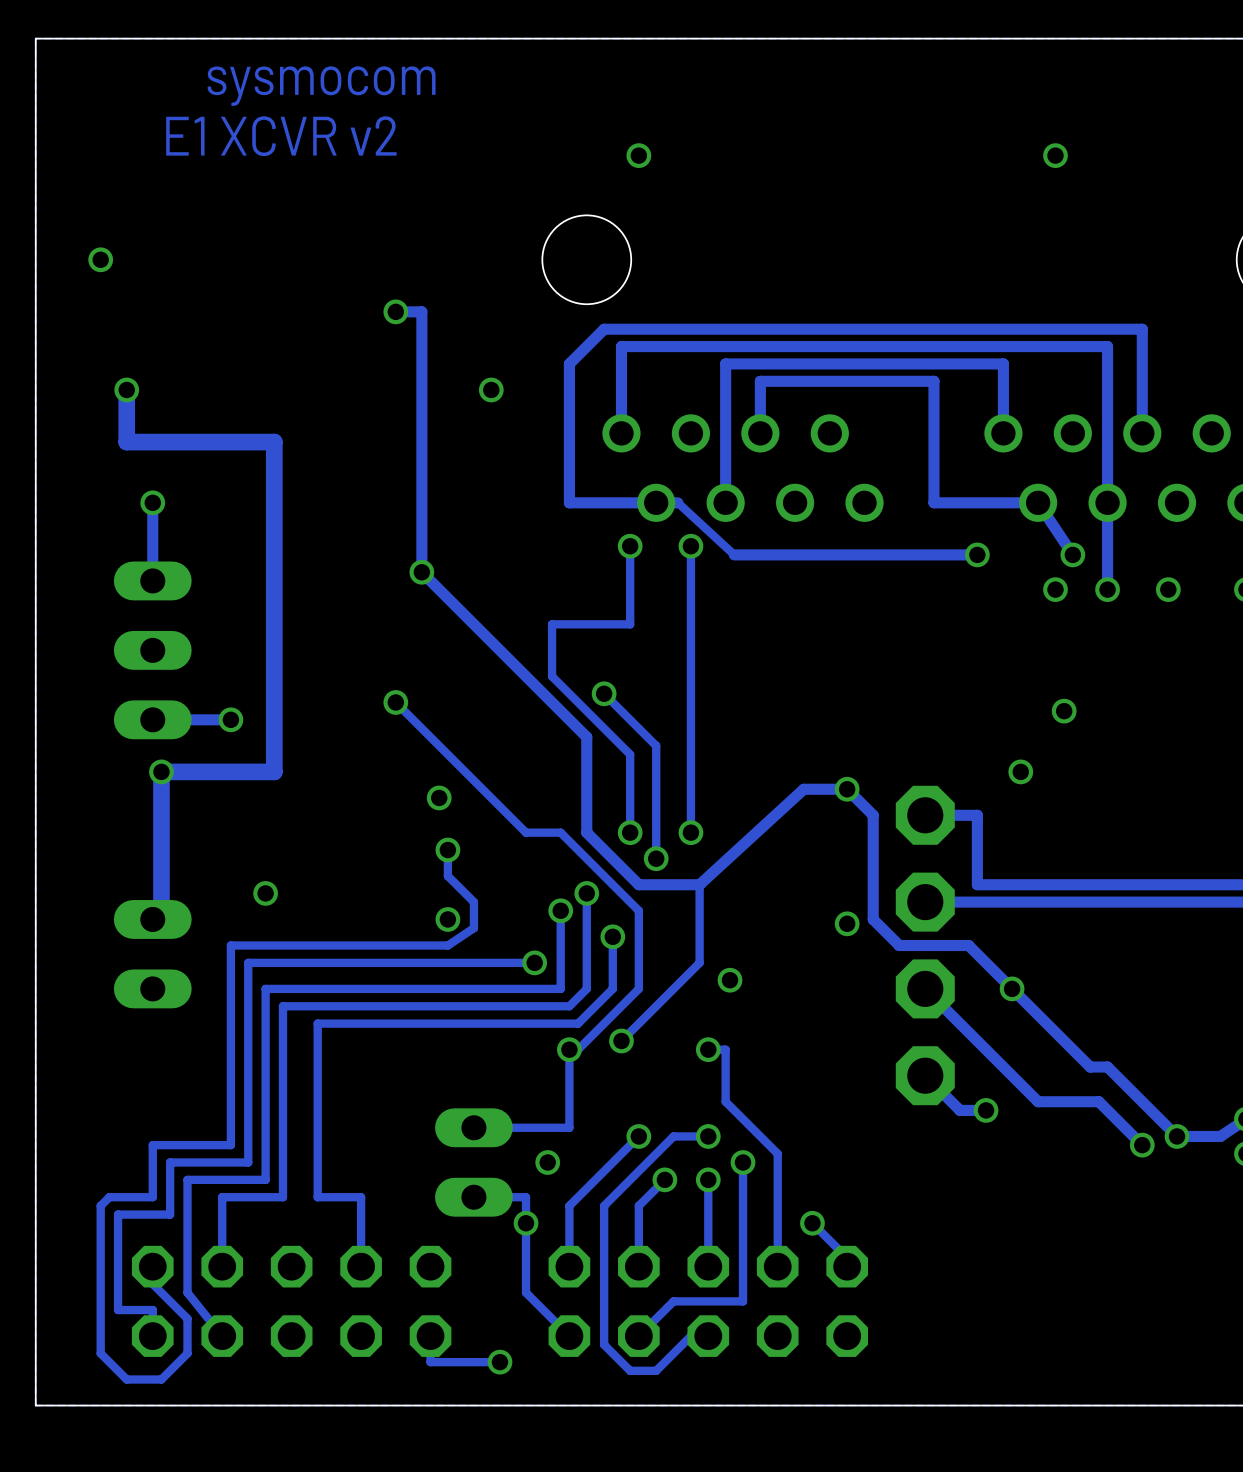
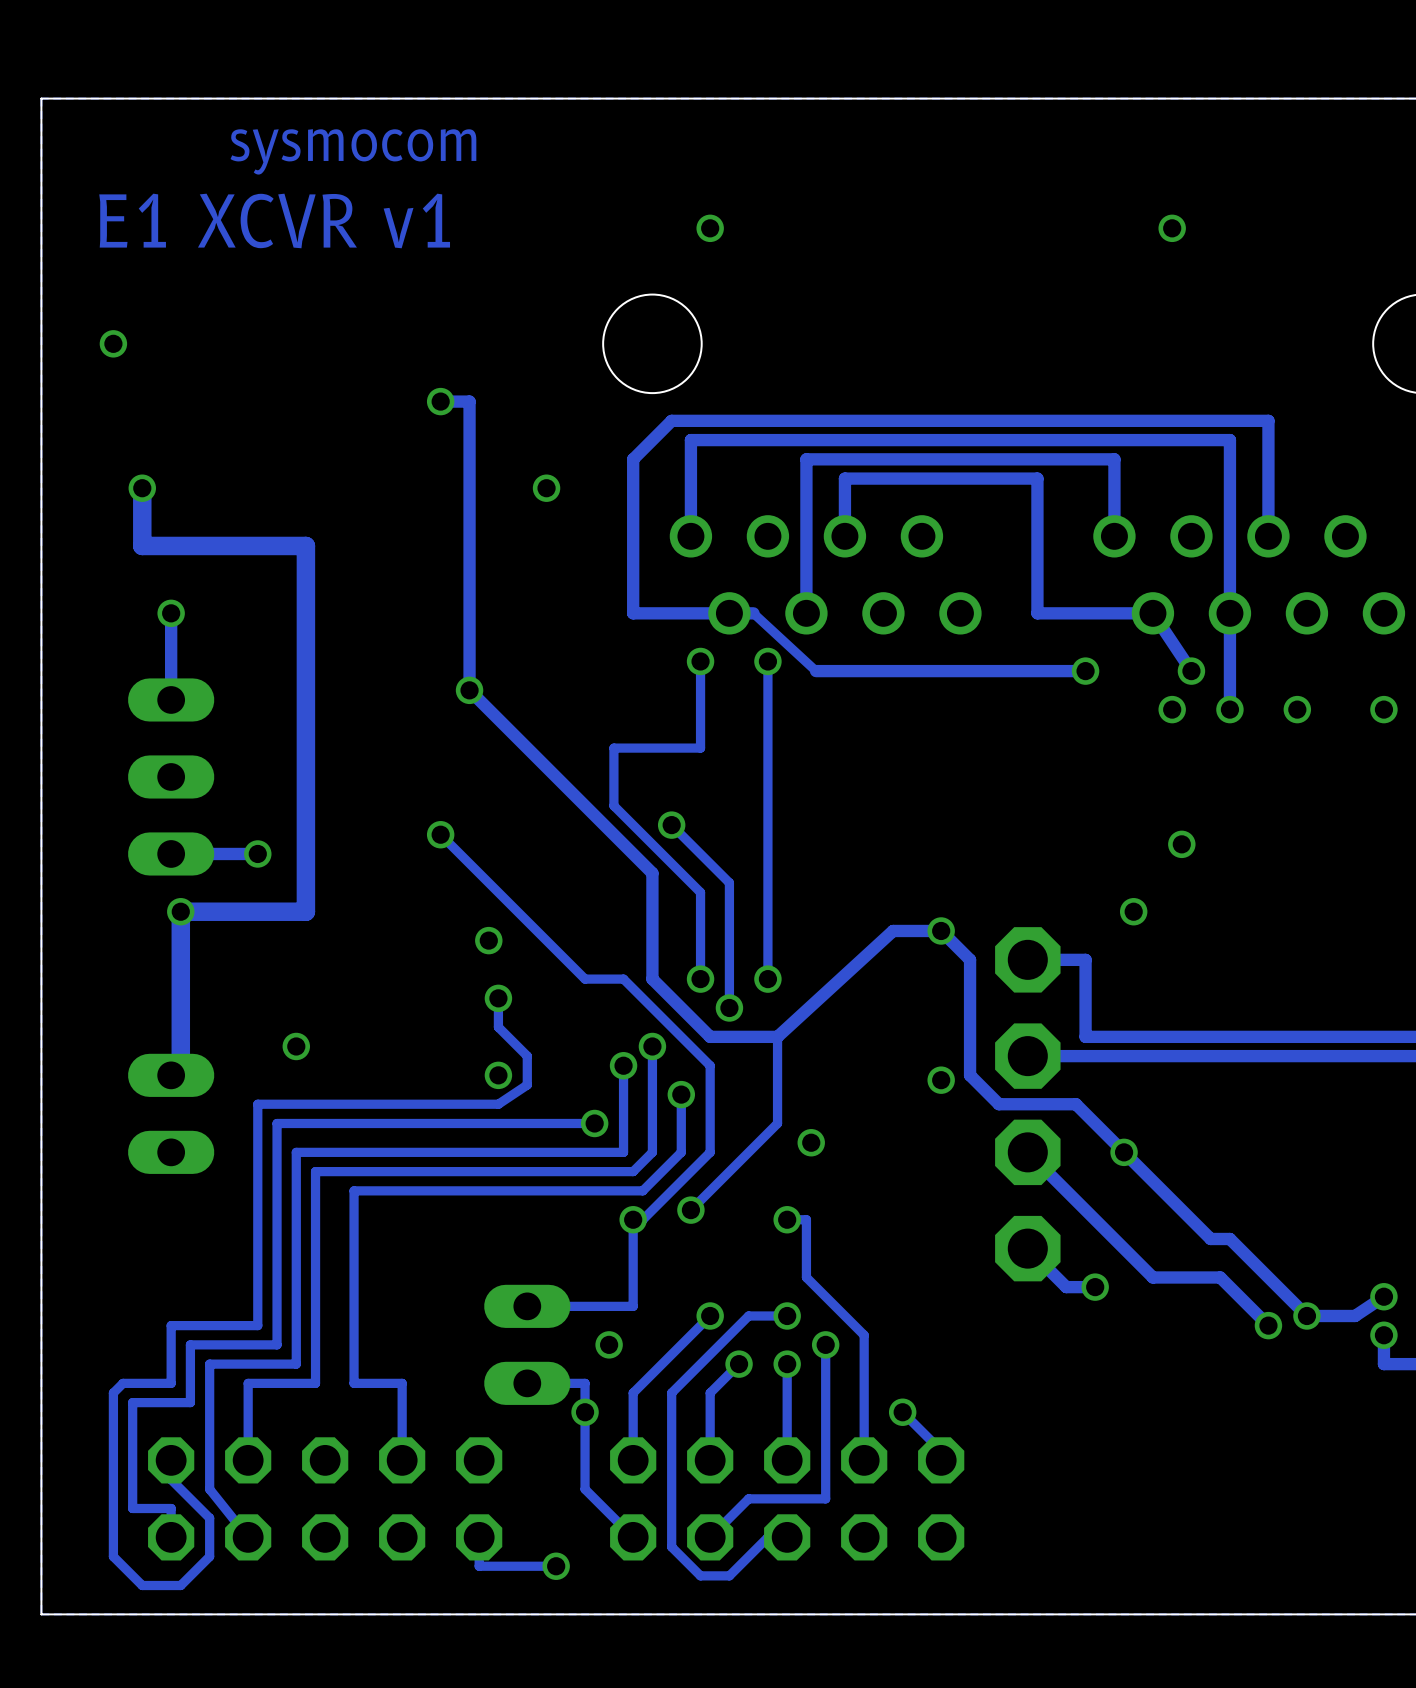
text: E1 XCVR v2 (281, 136) -> E1 XCVR v1 (274, 220)

